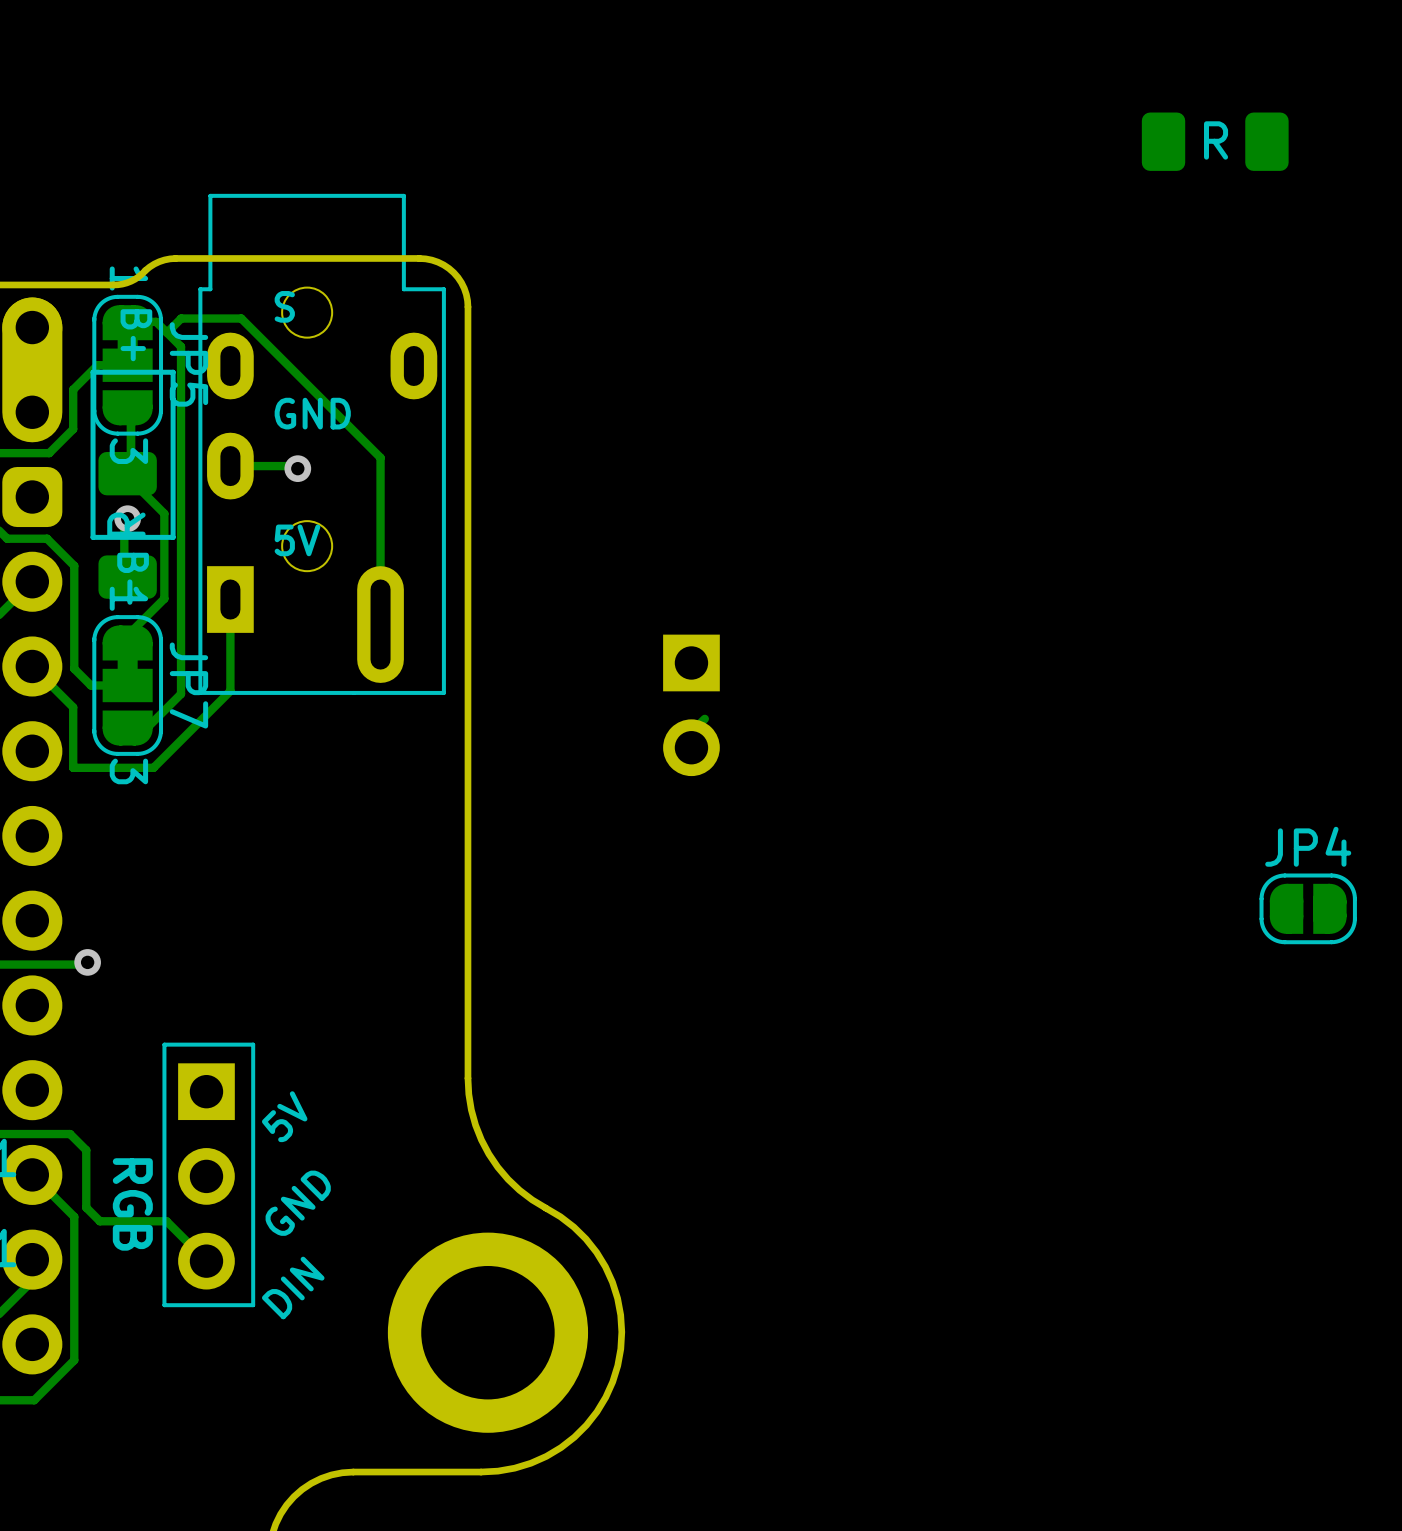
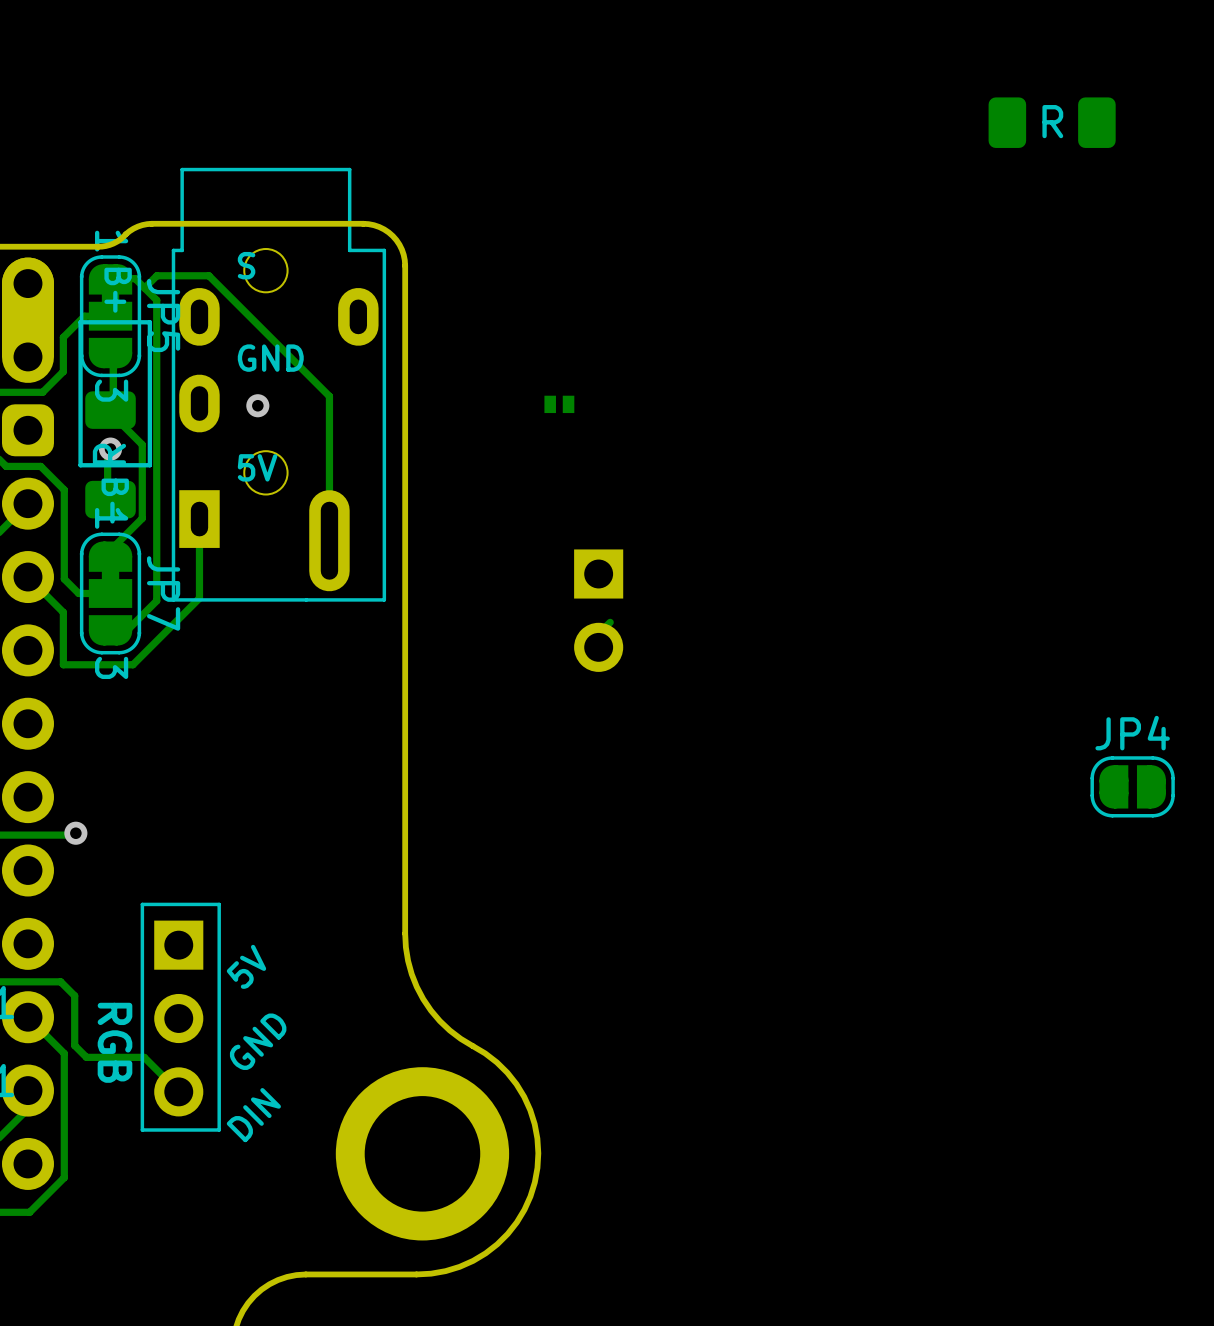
track: (295, 466) (230, 466) -> none
part: none -> (559, 404)

